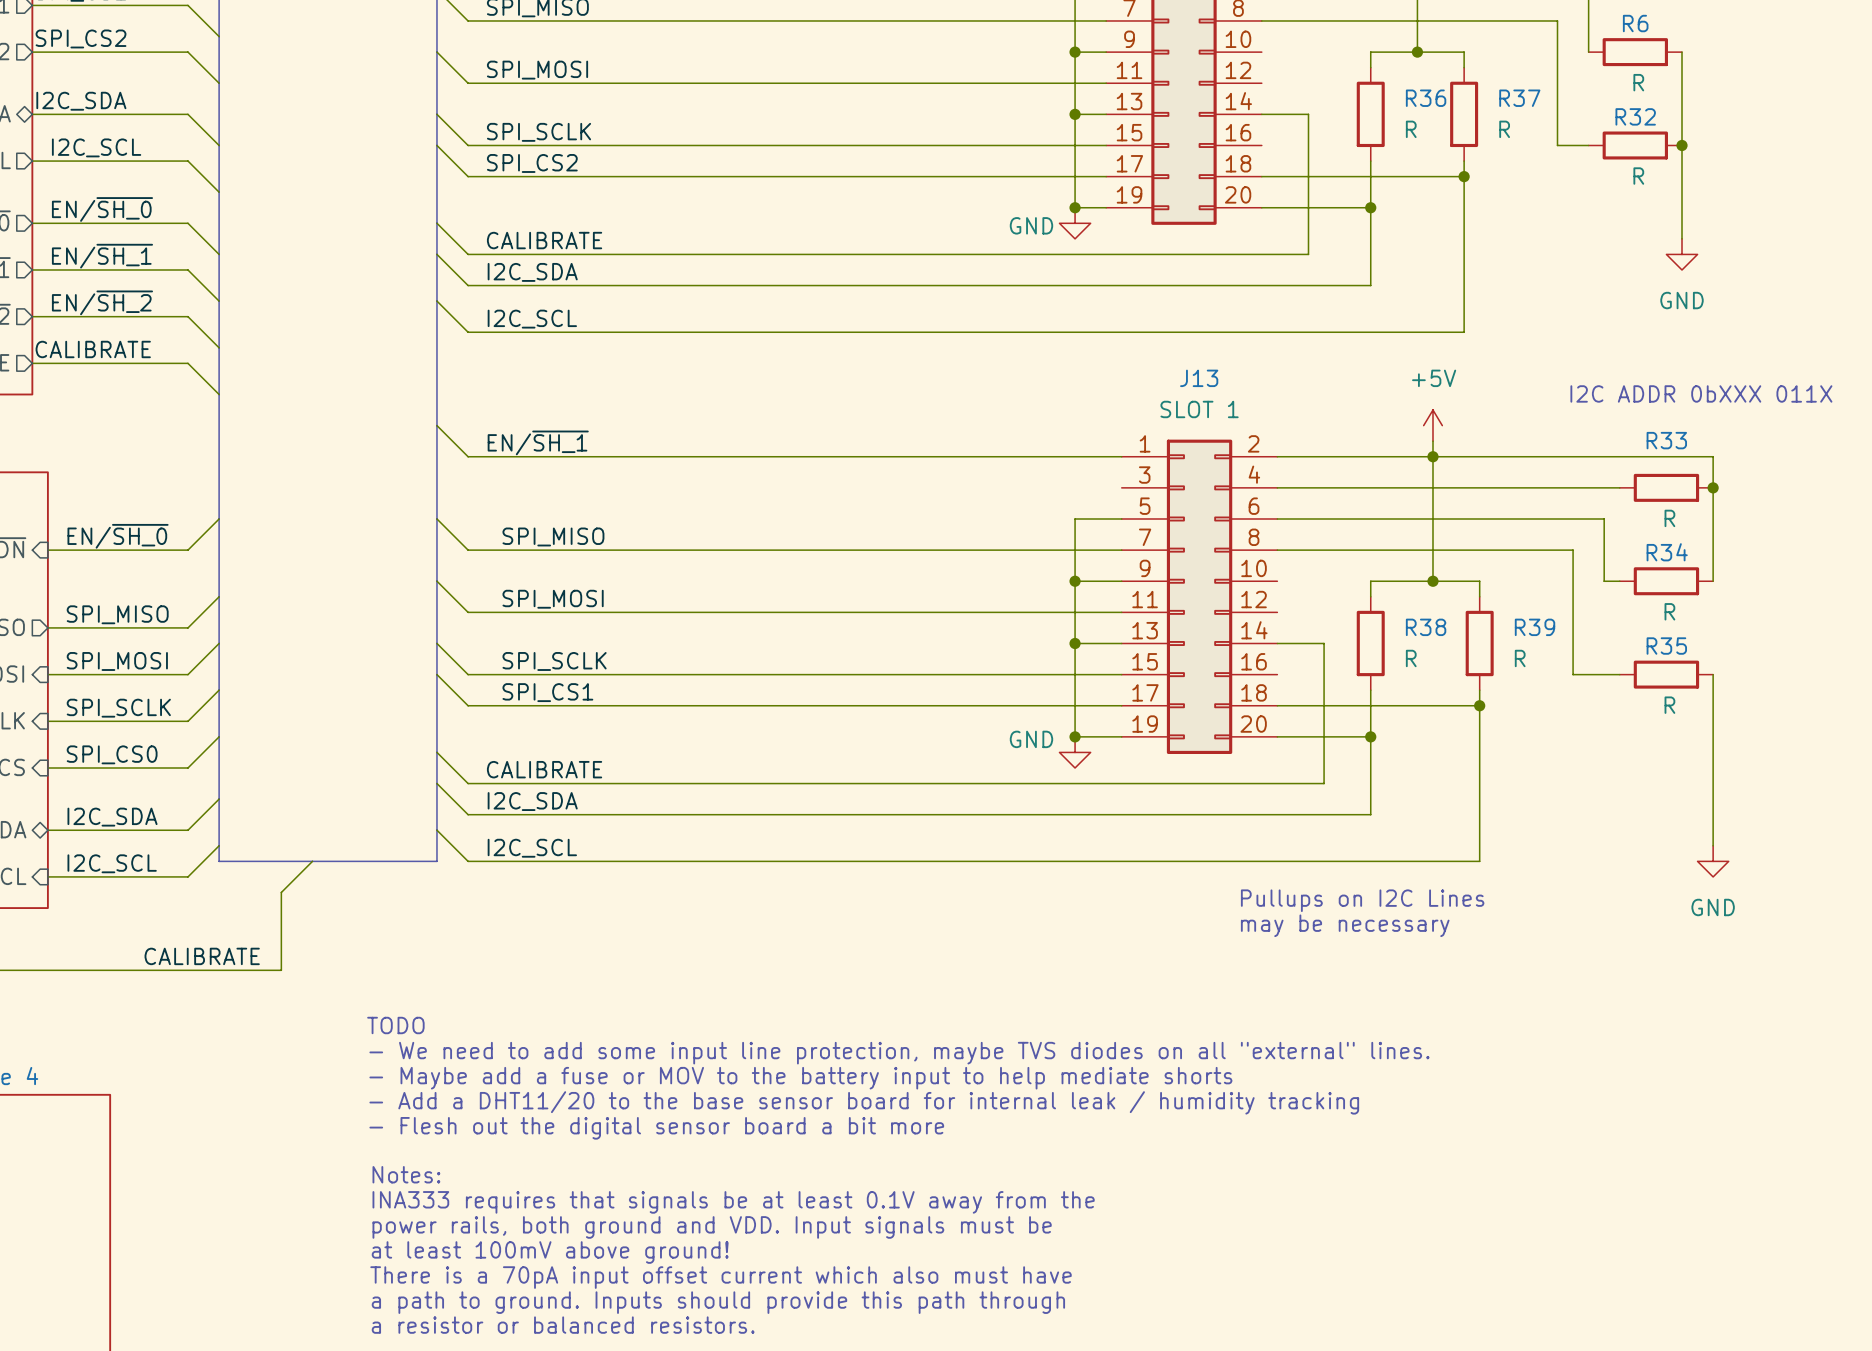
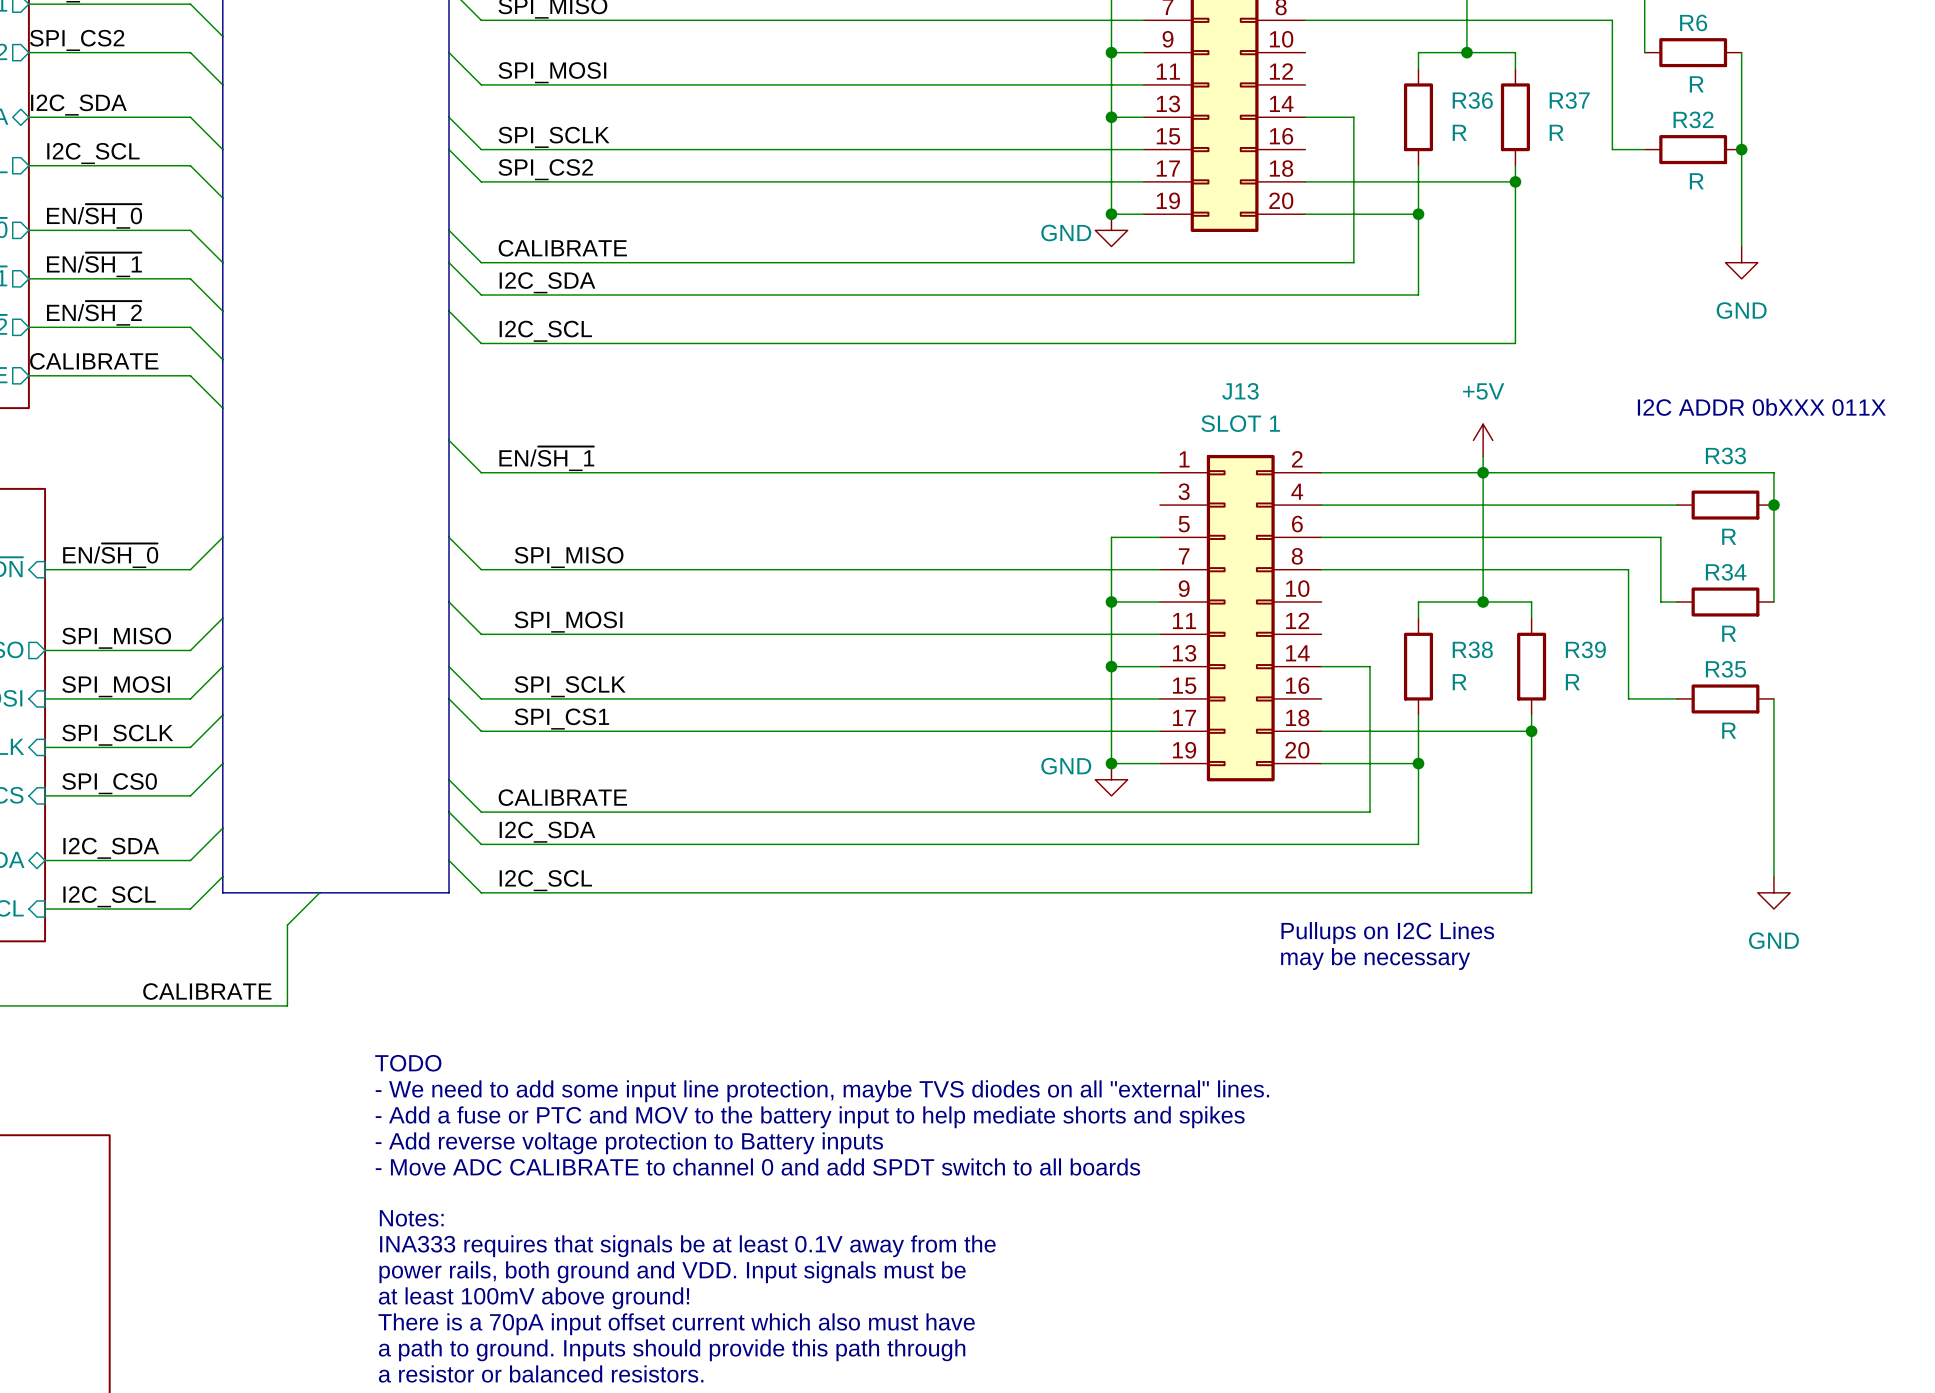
text: - Maybe add a fuse or MOV to the battery input to help mediate shorts (800, 1078) -> - Add a fuse or PTC and MOV to the battery input to help mediate shorts and spikes (810, 1117)
text: - Add a DHT11/20 to the base sensor board for internal leak / humidity tracking (864, 1102) -> - Add reverse voltage protection to Battery inputs (629, 1143)
text: - Flesh out the digital sensor board a bit more (656, 1128) -> - Move ADC CALIBRATE to channel 0 and add SPDT switch to all boards (757, 1166)

